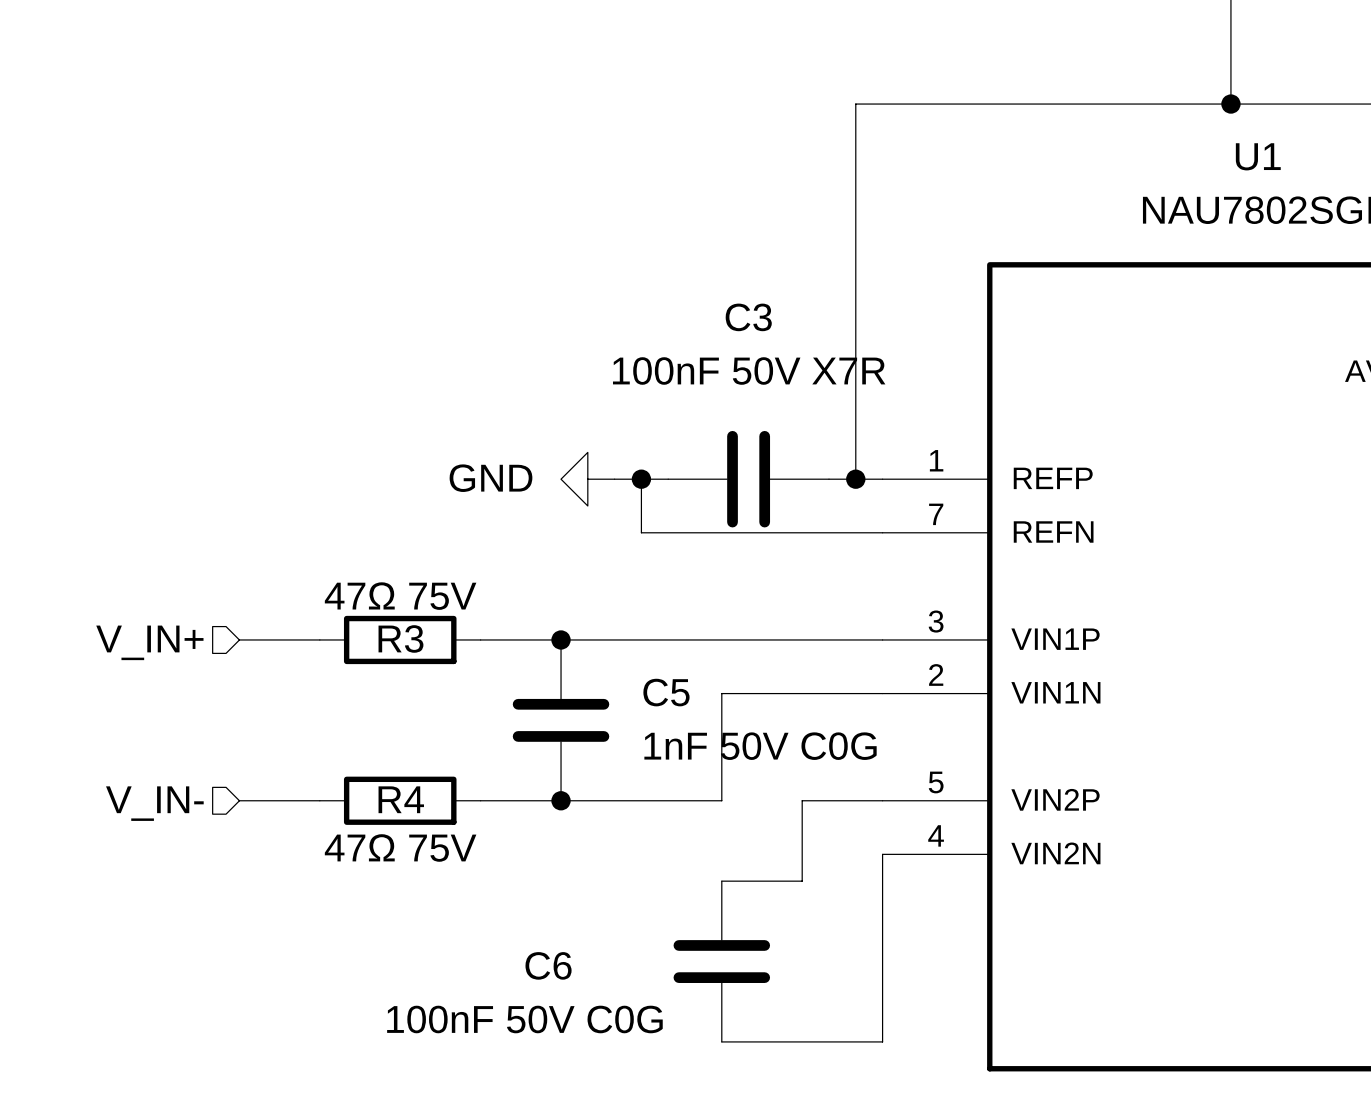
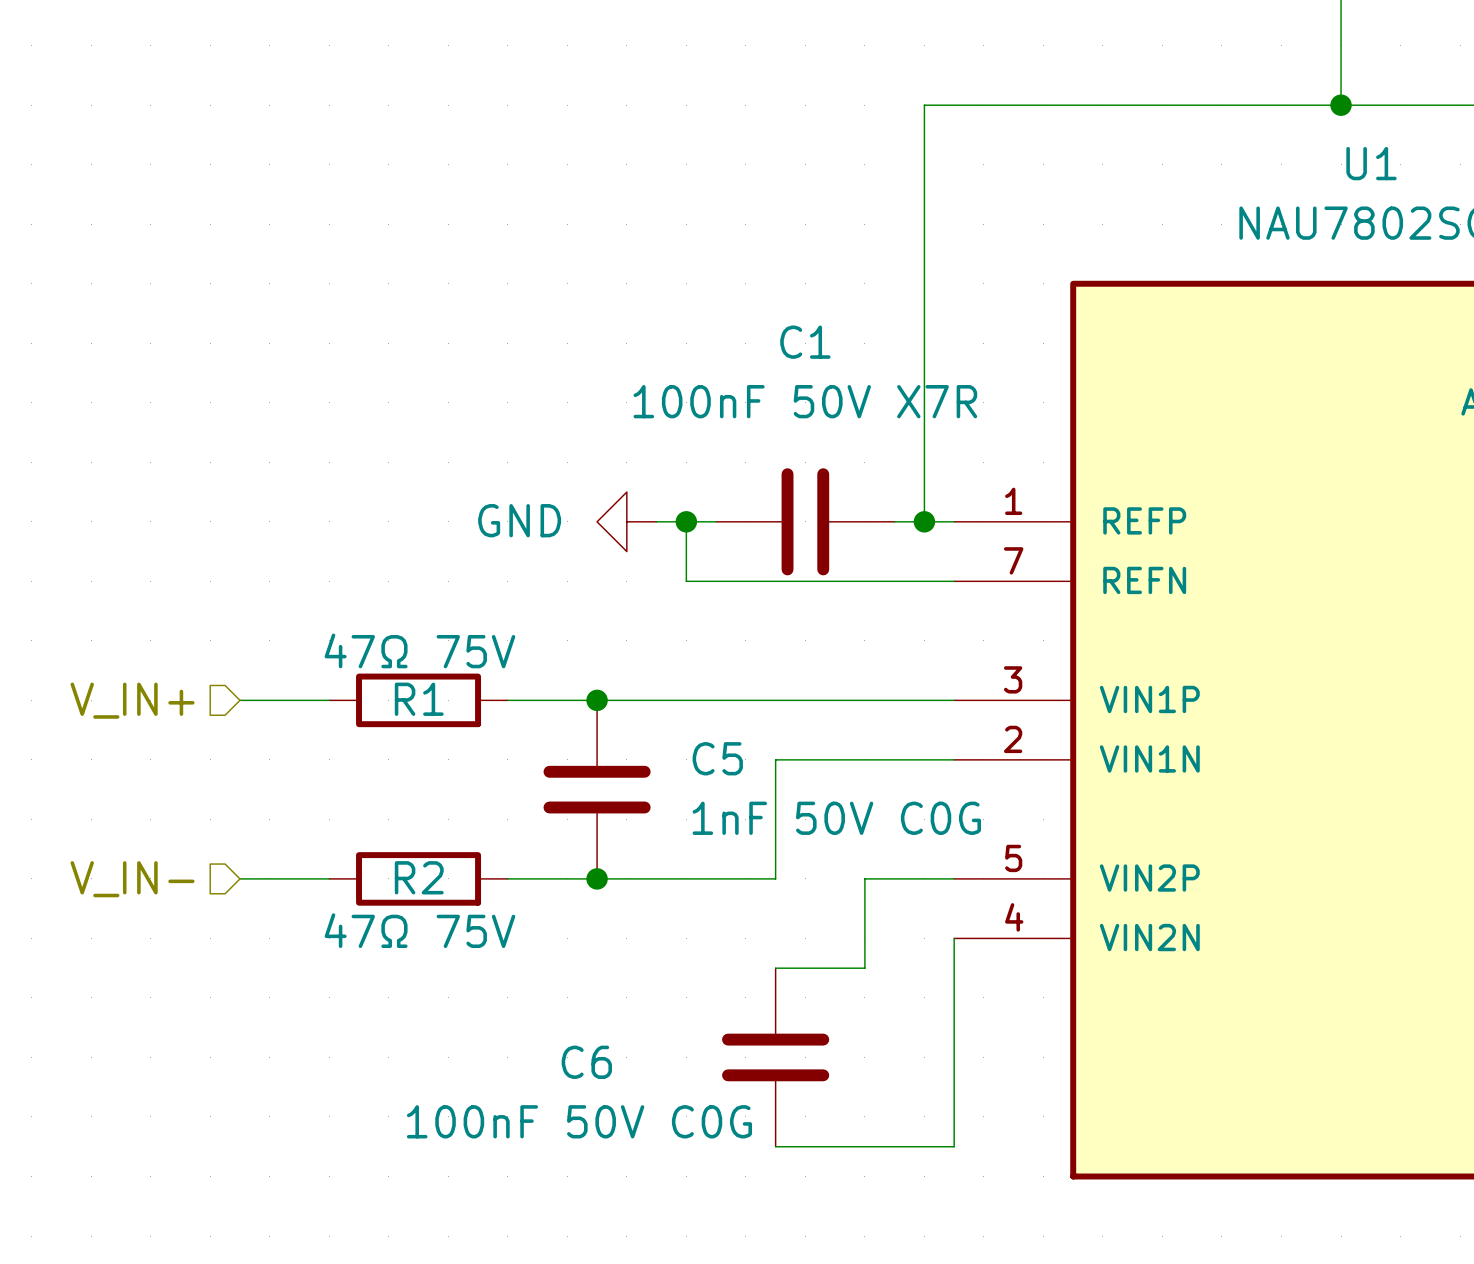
C3 name: C3 (748, 317) -> C1 (805, 342)
R3 name: R3 (400, 638) -> R1 (419, 699)
R4 name: R4 (401, 799) -> R2 (419, 877)

